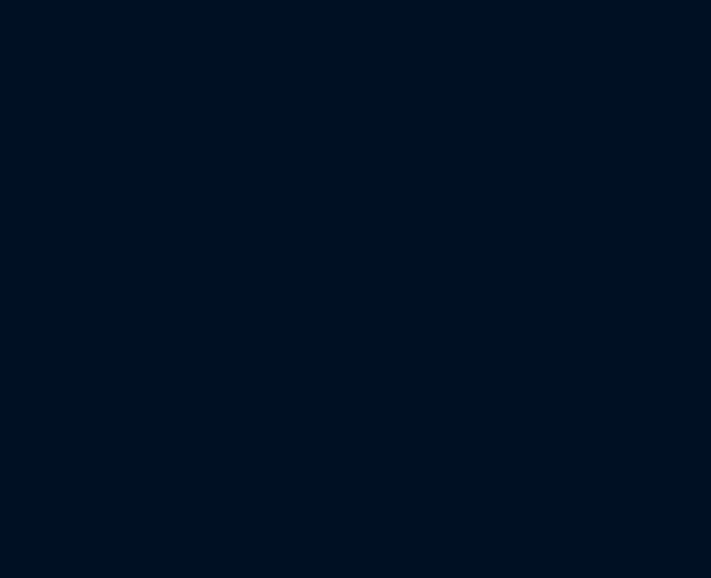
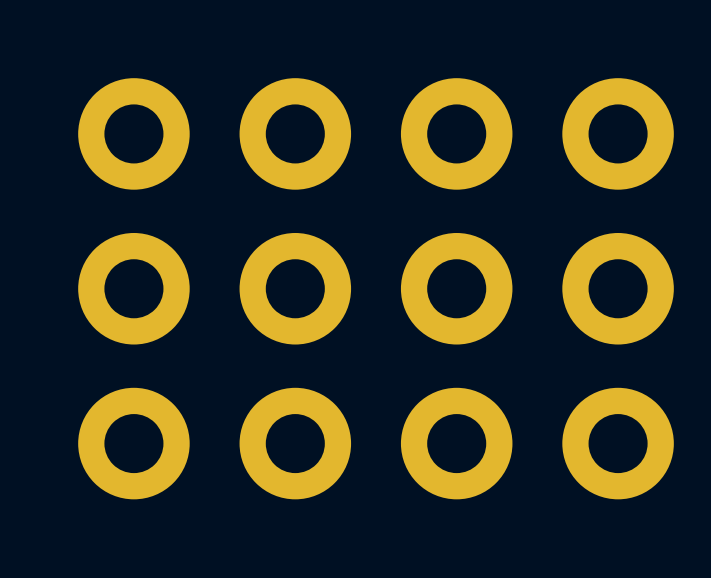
part: none -> (133, 133)
part: none -> (295, 133)
part: none -> (456, 133)
part: none -> (618, 133)
part: none -> (133, 288)
part: none -> (295, 288)
part: none -> (456, 288)
part: none -> (618, 288)
part: none -> (133, 443)
part: none -> (295, 443)
part: none -> (456, 443)
part: none -> (618, 443)

